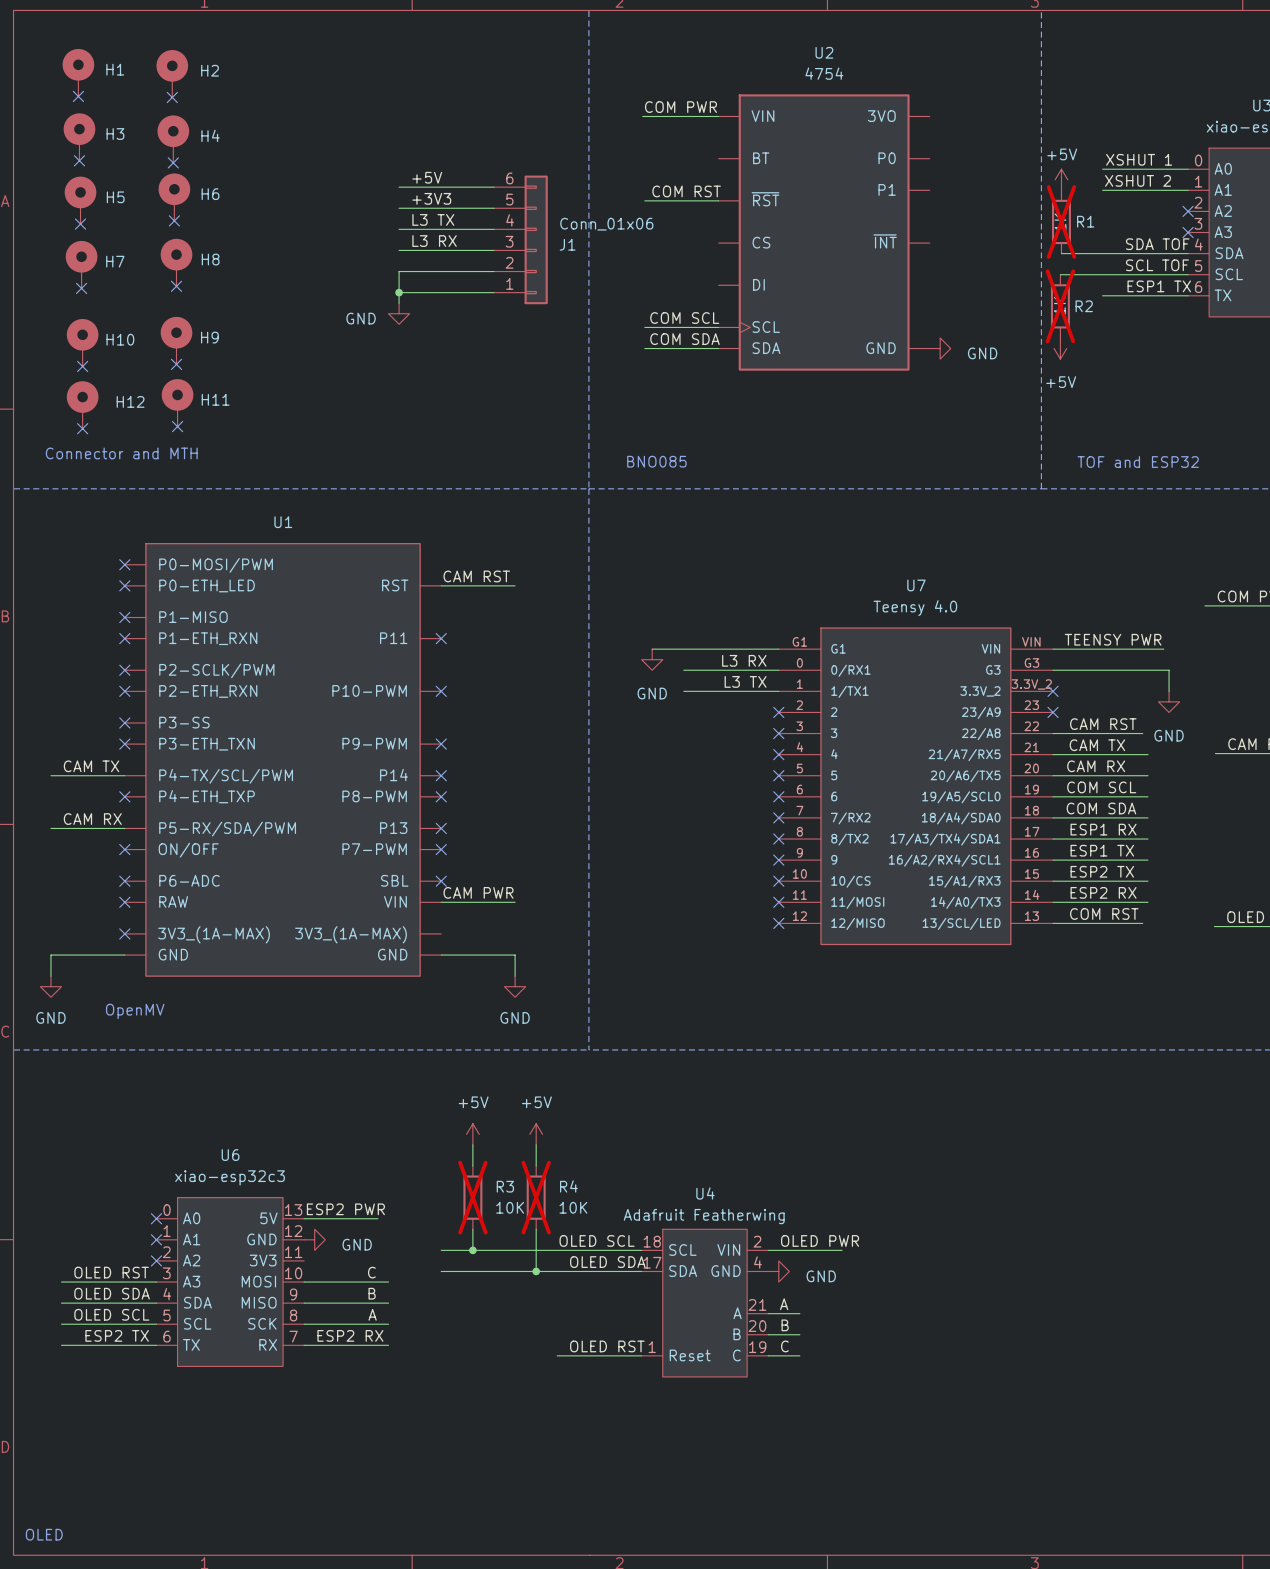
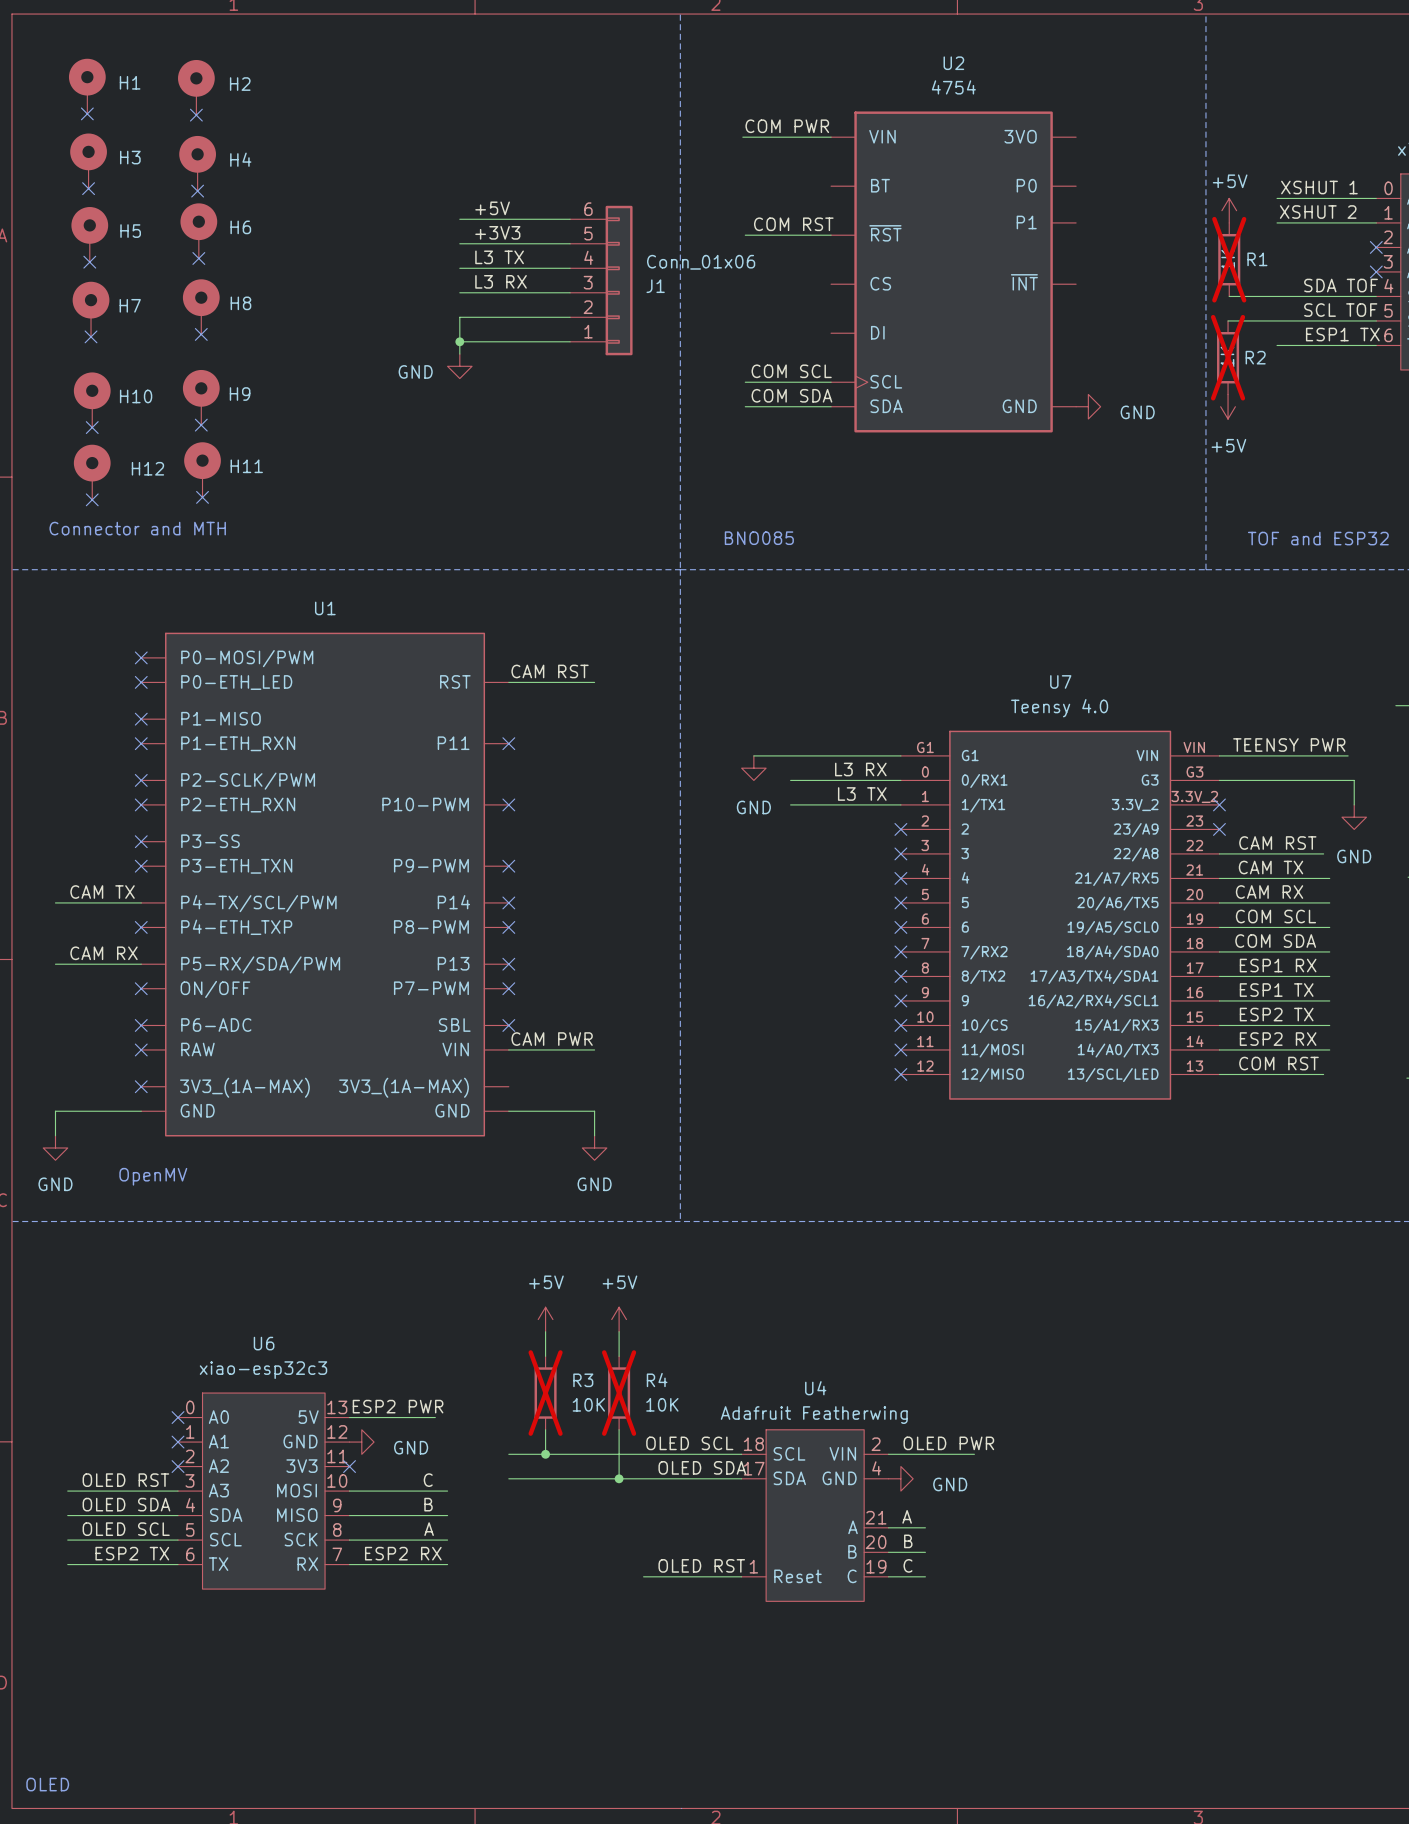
no-connect mark: none -> (349, 1466)

